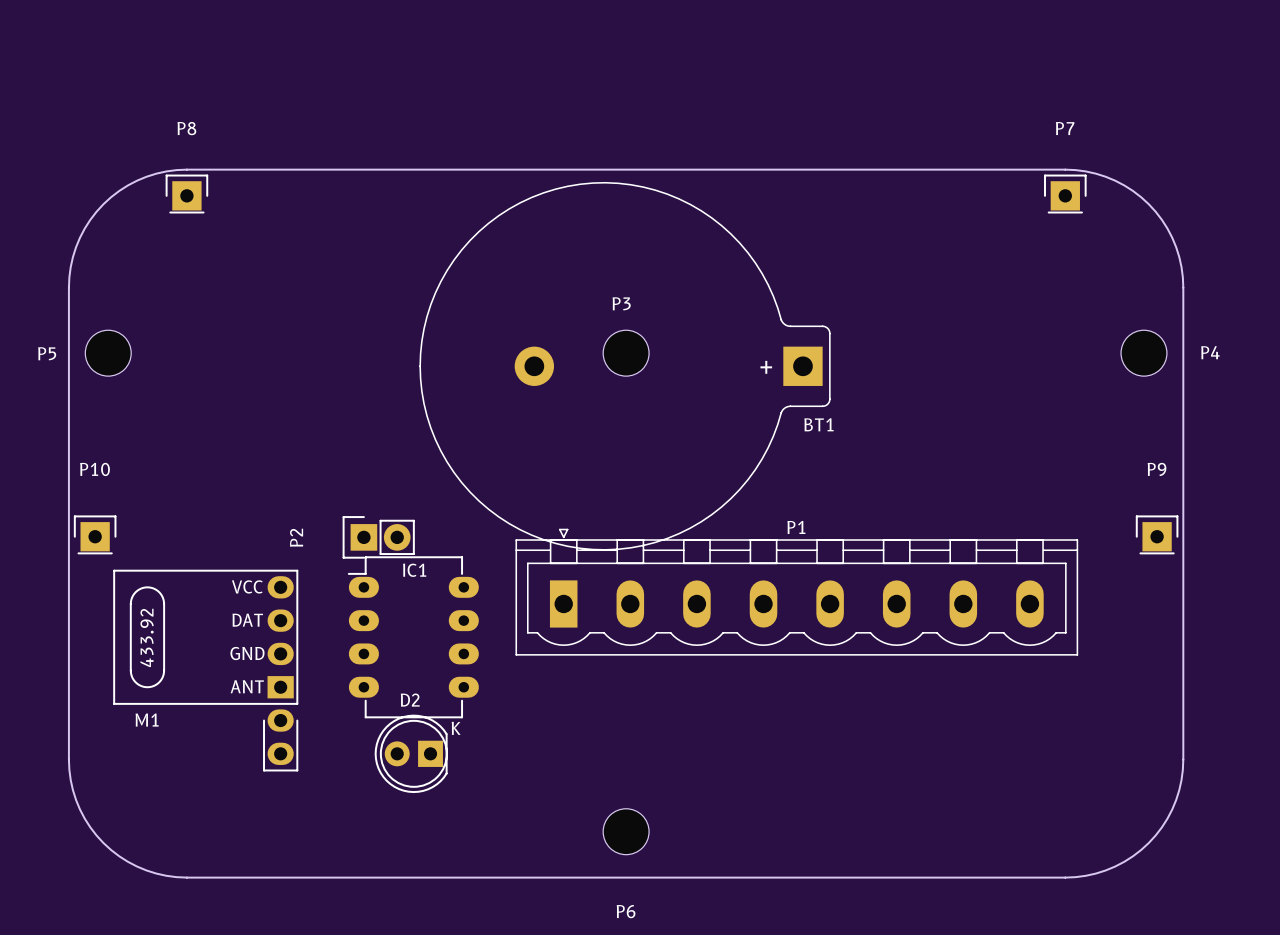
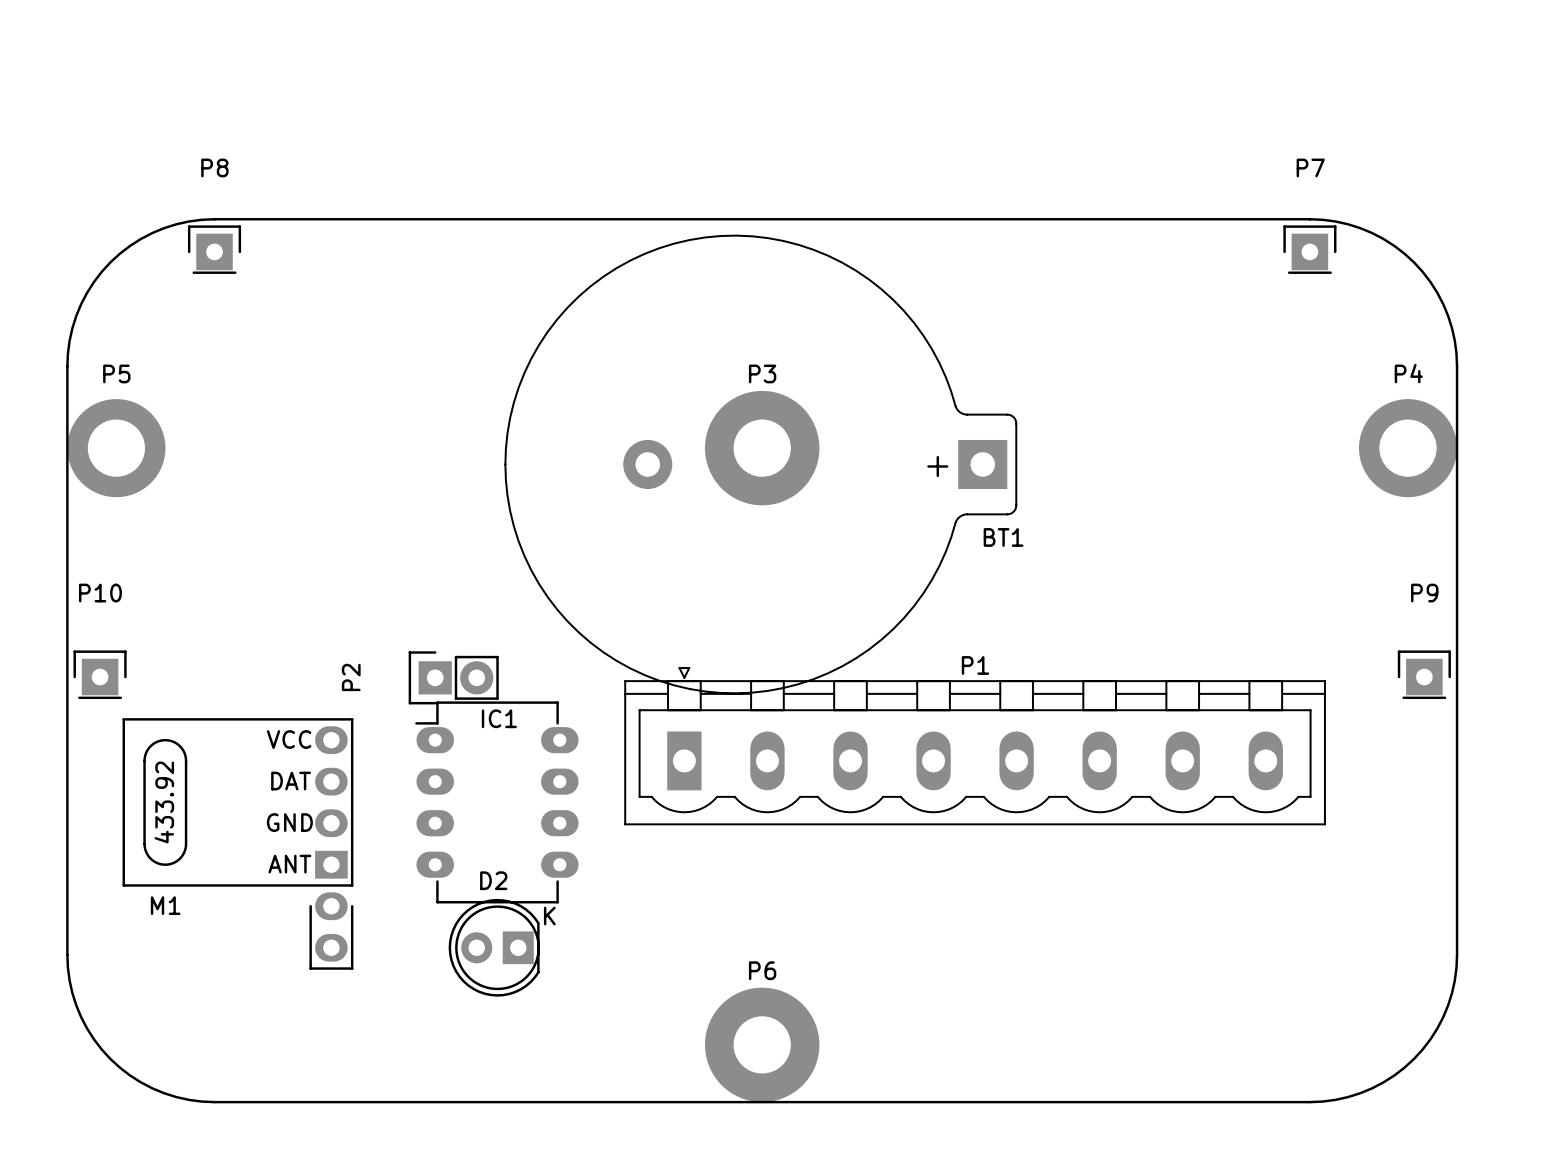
P5 footprint: [85, 330, 132, 377] -> [67, 399, 166, 498]
P3 footprint: [603, 330, 650, 377] -> [704, 390, 820, 506]
P4 footprint: [1121, 330, 1167, 377] -> [1358, 399, 1458, 498]
P4 name position: P4 (1210, 352) -> P4 (1408, 373)
P5 name position: P5 (47, 353) -> P5 (116, 373)
P6 footprint: [603, 808, 650, 855] -> [704, 987, 820, 1103]
P6 name position: P6 (626, 911) -> P6 (762, 970)

